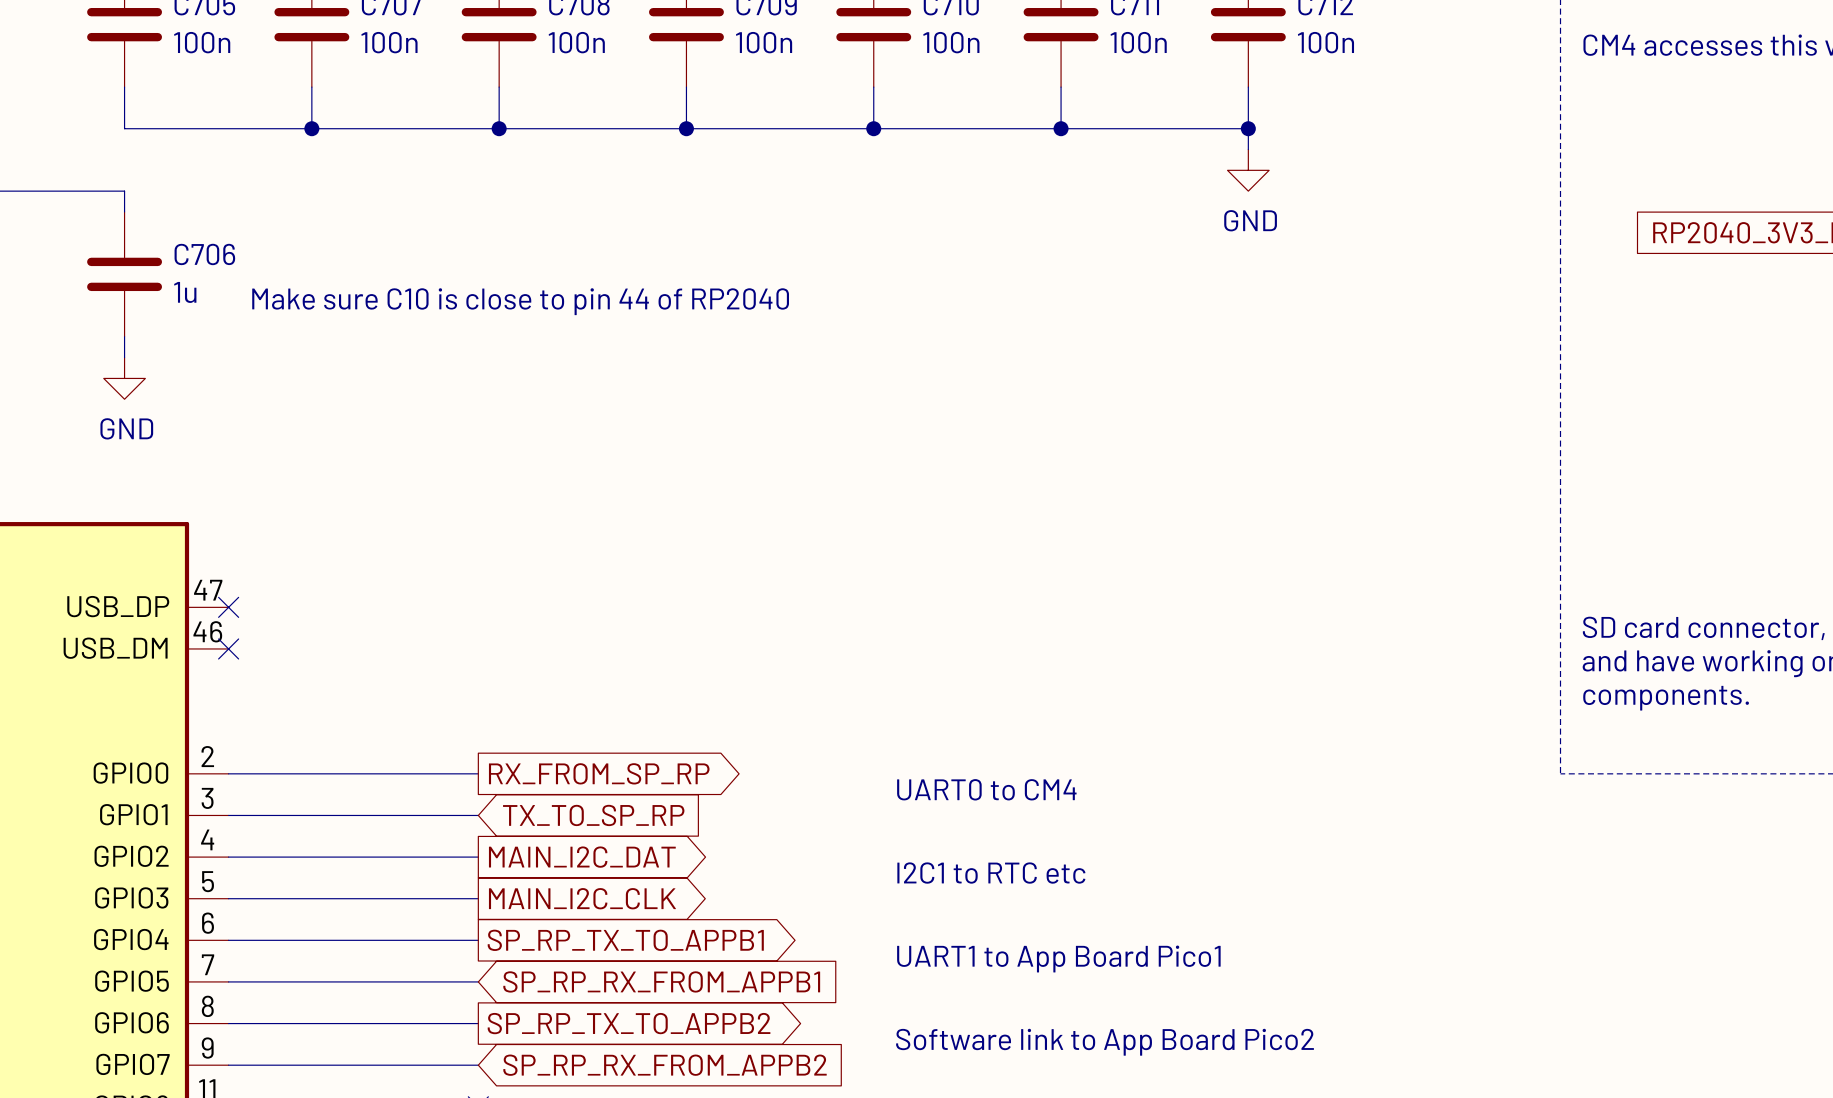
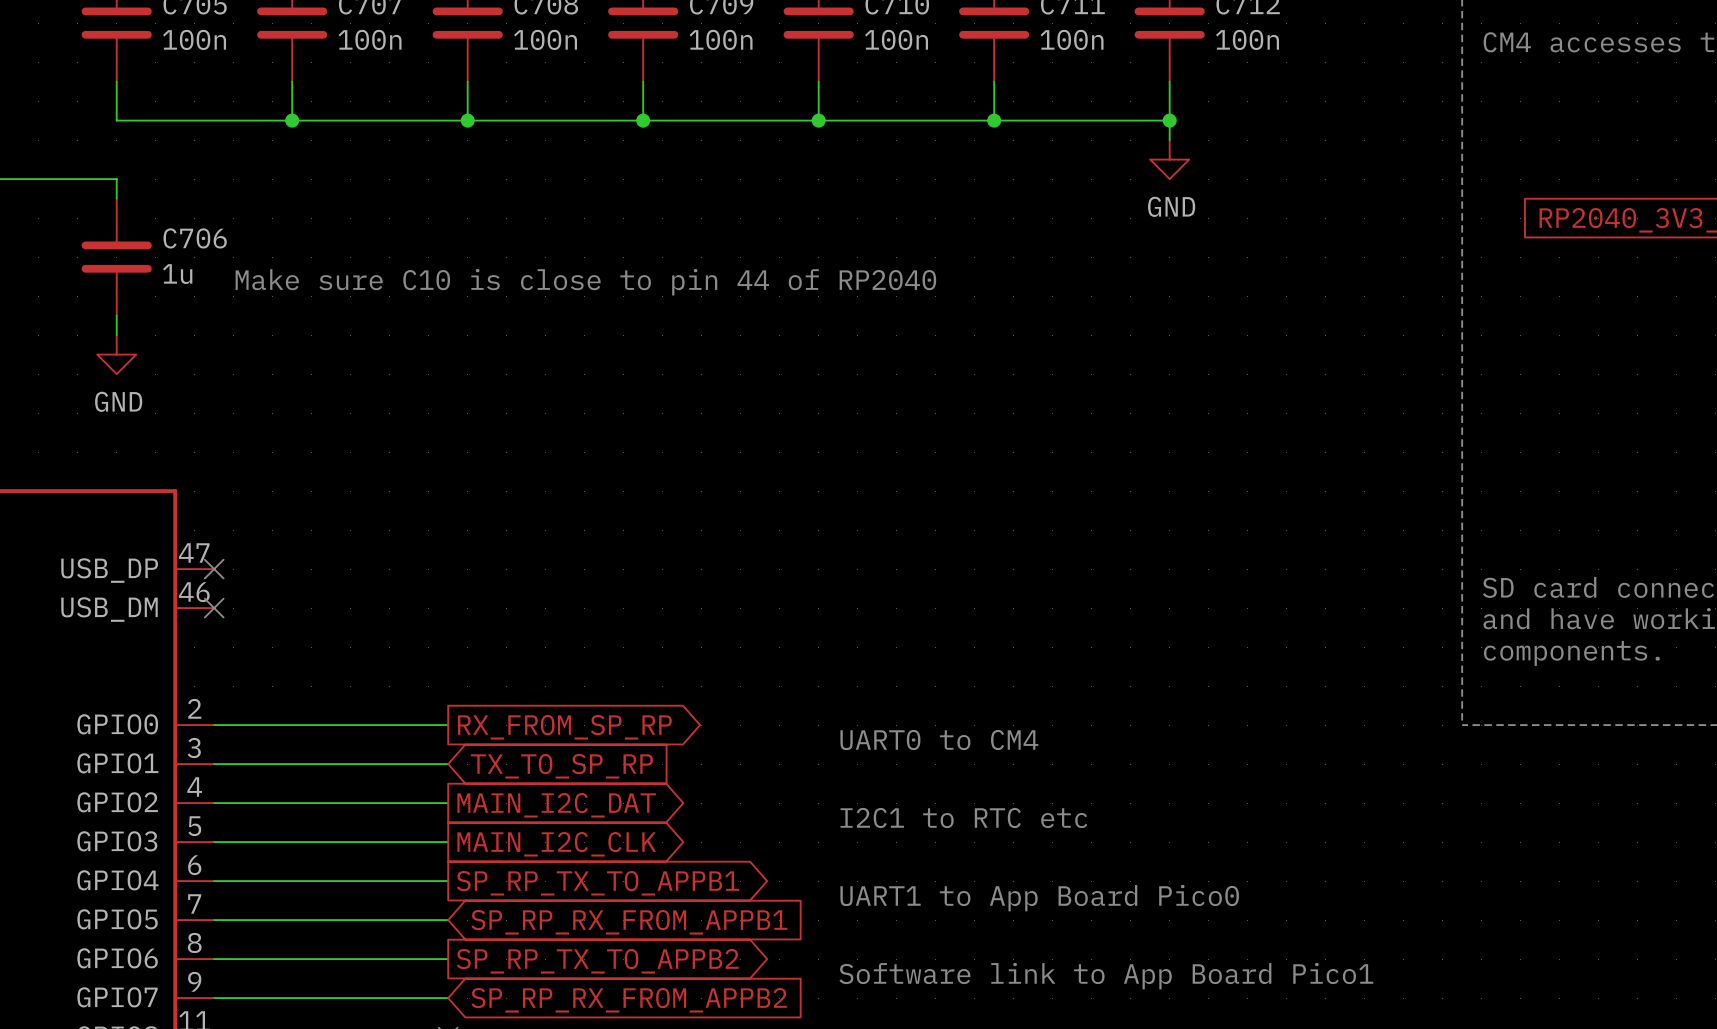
text: UART1 to App Board Pico1 (1058, 959) -> UART1 to App Board Pico0 (1039, 898)
text: Software link to App Board Pico2 (1105, 1042) -> Software link to App Board Pico1 (1106, 976)

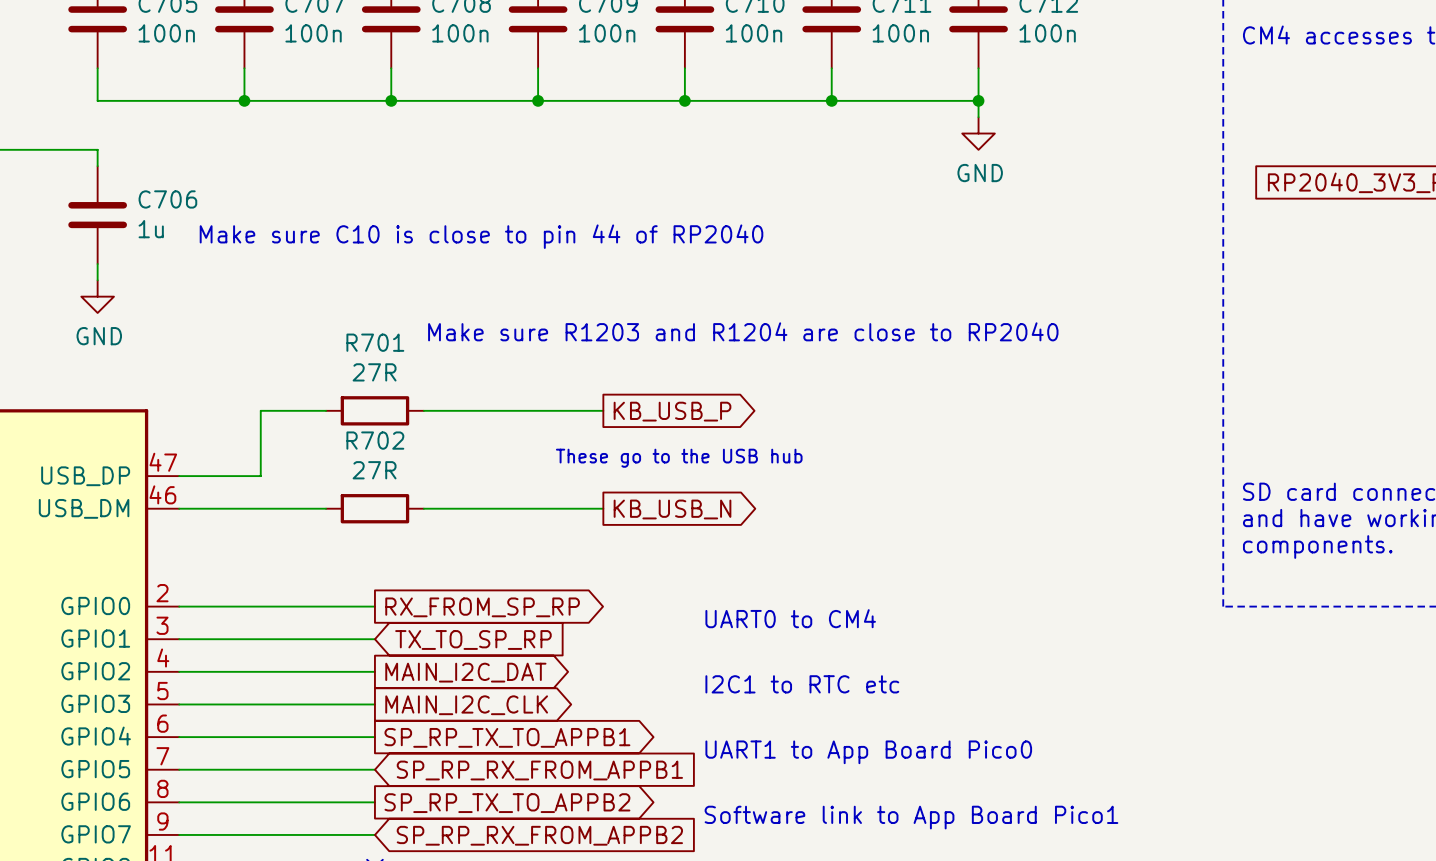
text: none -> Make sure R1203 and R1204 are close to RP2040 (743, 331)
wire: none -> (326, 410) (260, 410) (260, 476) (179, 476)
R701: none -> 27R (374, 410)
wire: none -> (423, 410) (603, 410)
global label: none -> KB_USB_P (672, 411)
text: none -> These go to the USB hub (679, 458)
no-connect mark: (214, 569) -> none
wire: none -> (179, 508) (326, 508)
no-connect mark: (214, 608) -> none
R702: none -> 27R (374, 508)
wire: none -> (423, 508) (603, 508)
global label: none -> KB_USB_N (672, 509)

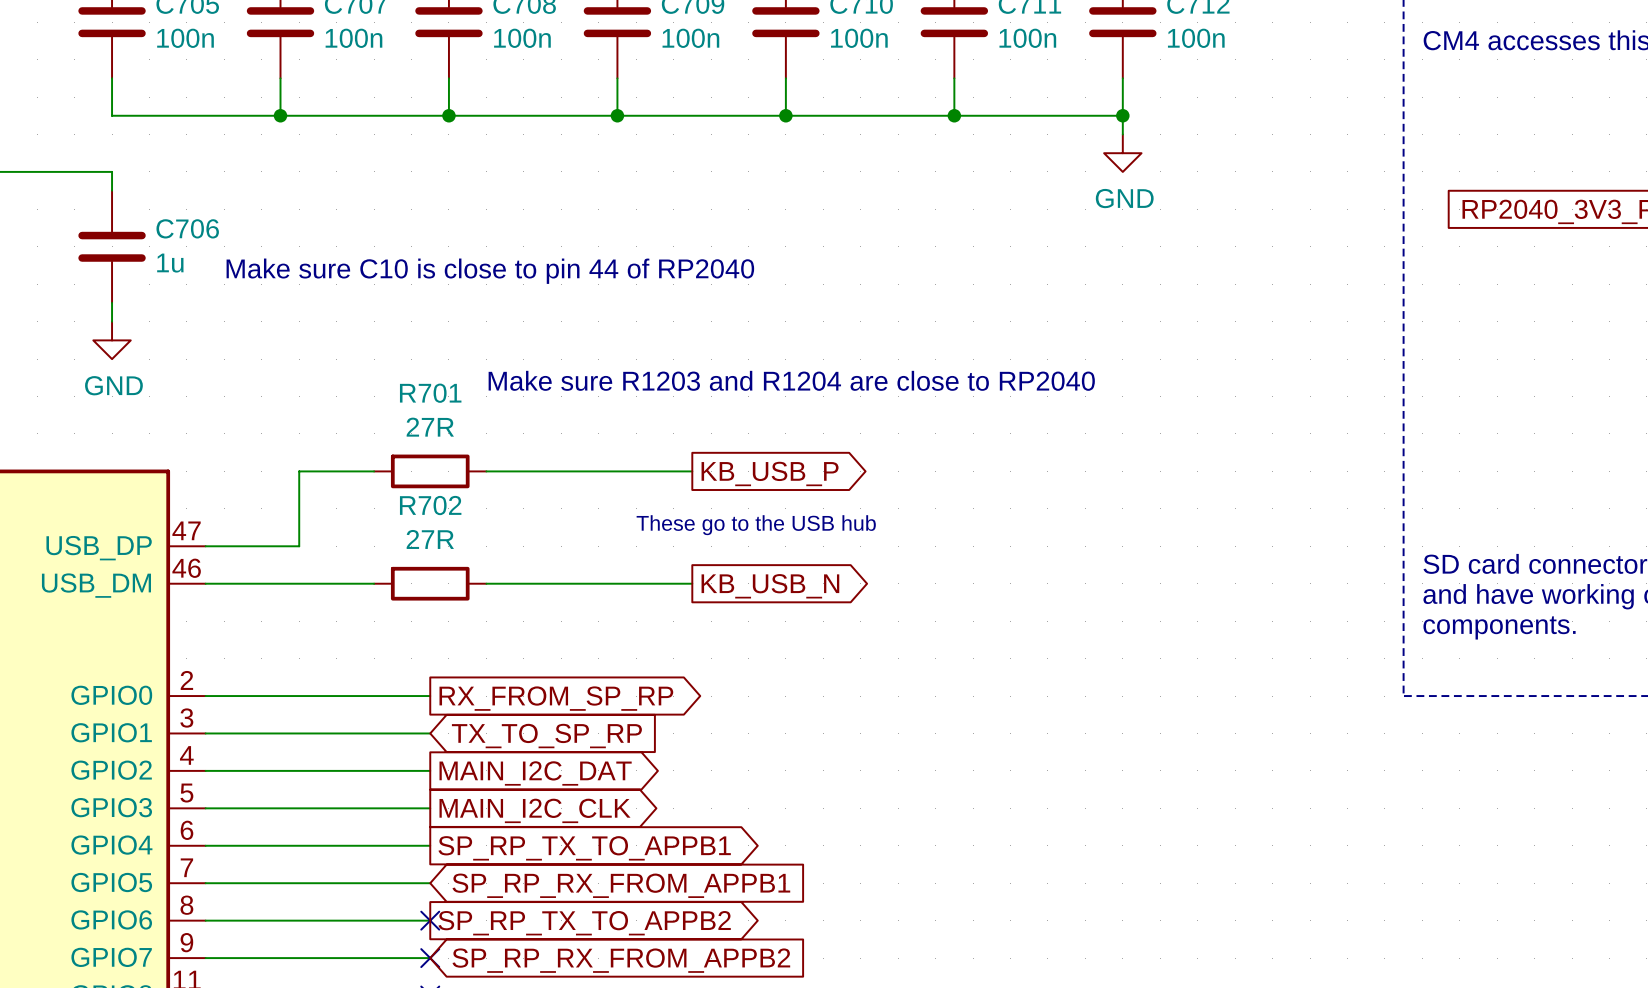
text: UART0 to CM4 (790, 618) -> none
text: I2C1 to RTC etc (802, 684) -> none
text: UART1 to App Board Pico0 (868, 752) -> none
no-connect mark: none -> (430, 920)
text: Software link to App Board Pico1 (911, 817) -> none
no-connect mark: none -> (430, 958)

